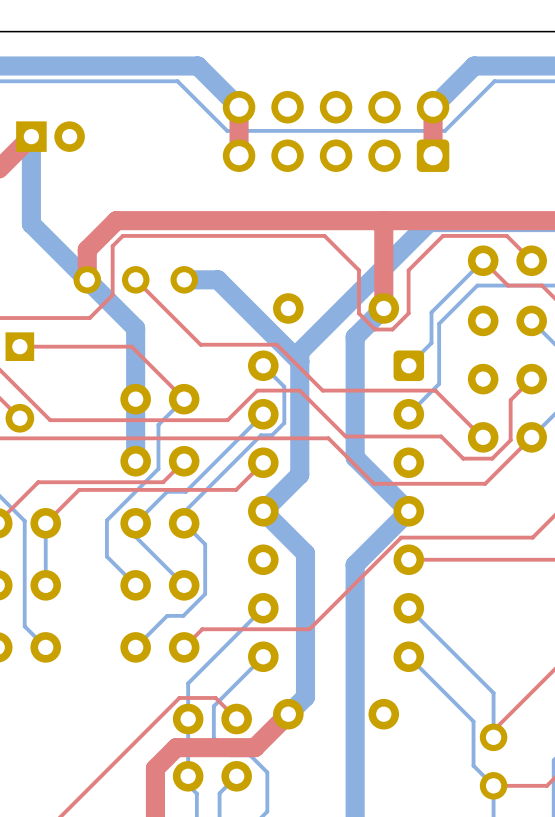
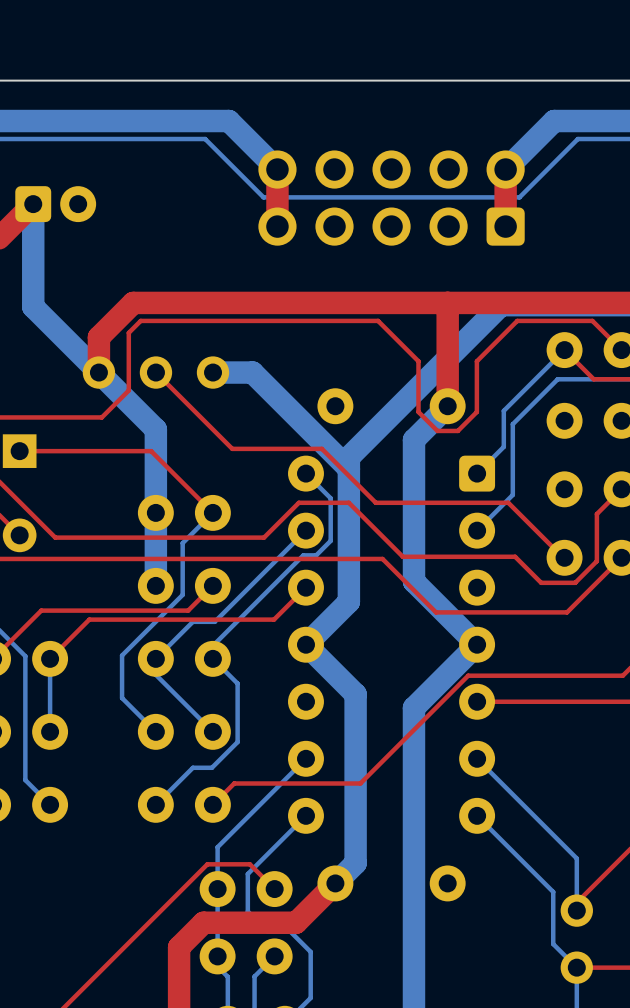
part footprint: [16, 121, 85, 152] -> [15, 186, 97, 223]

